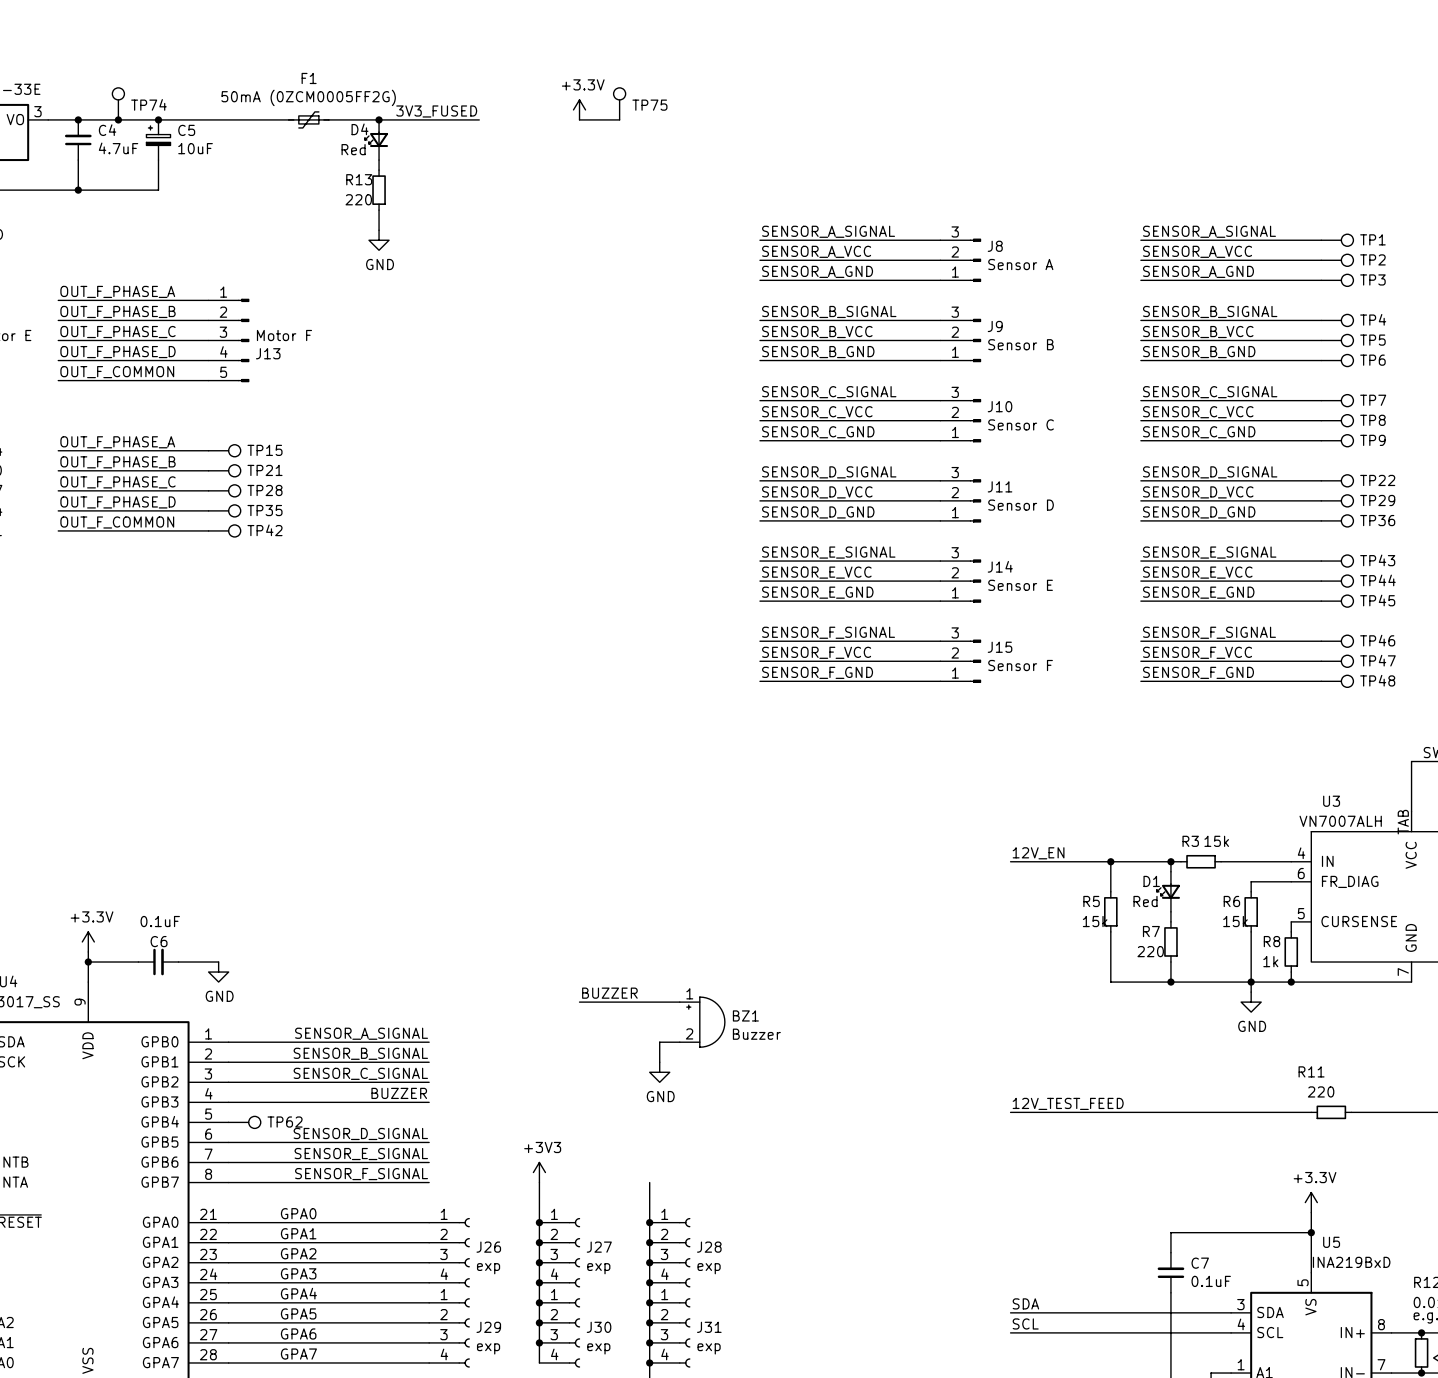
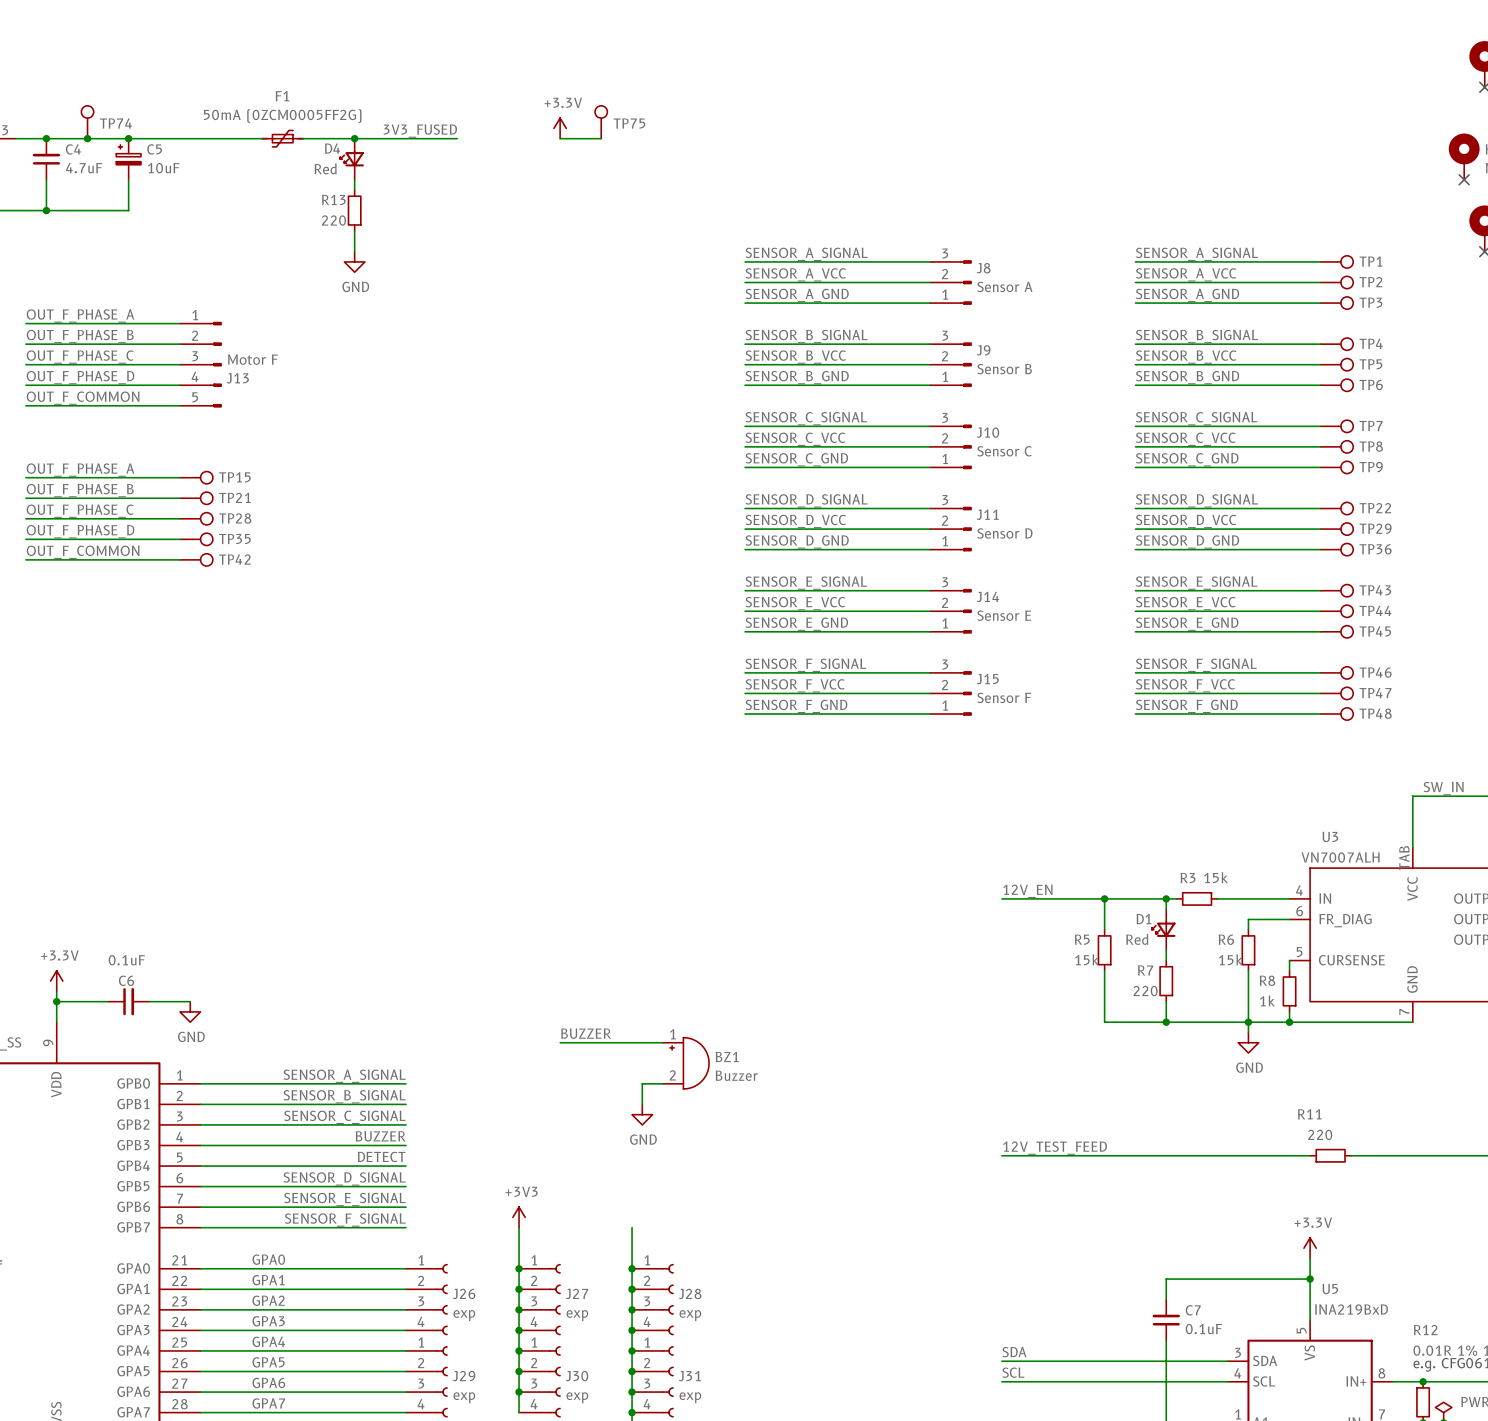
label: none -> DETECT (381, 1156)
wire: none -> (200, 1166) (406, 1166)
TP62: (244, 1122) -> none

